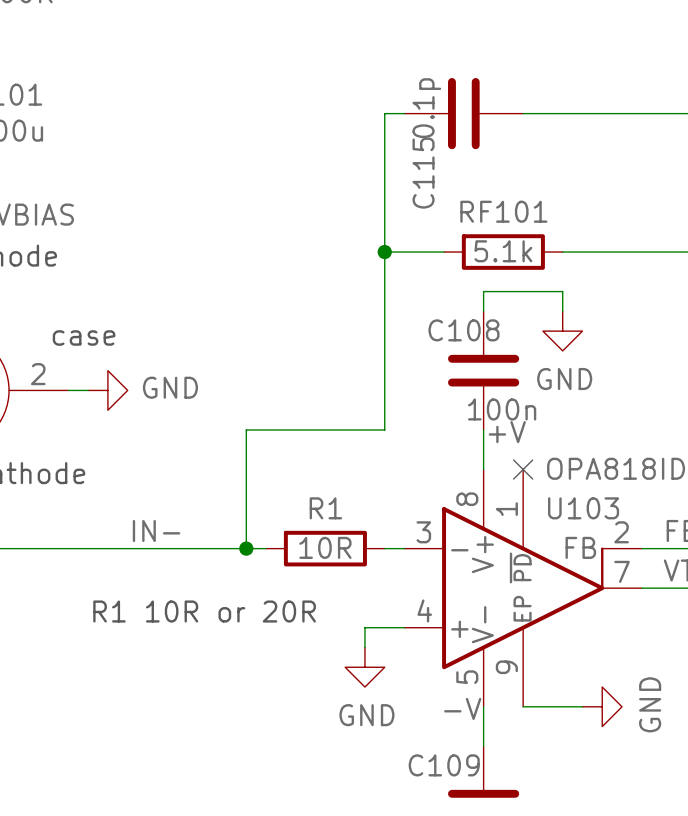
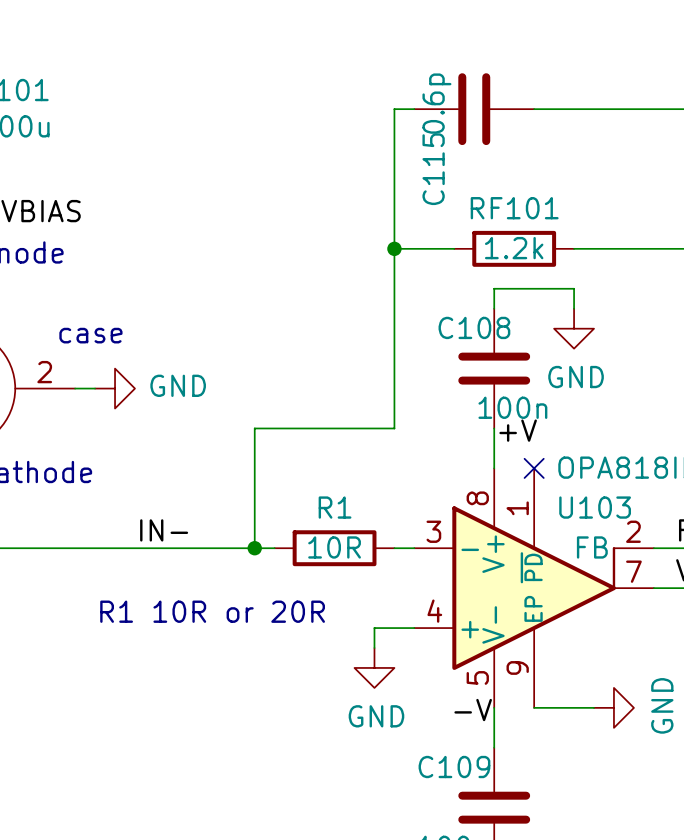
C115 value: 0.1p (426, 108) -> 0.6p (436, 103)
RF101 value: 5.1k (503, 251) -> 1.2k (514, 248)

